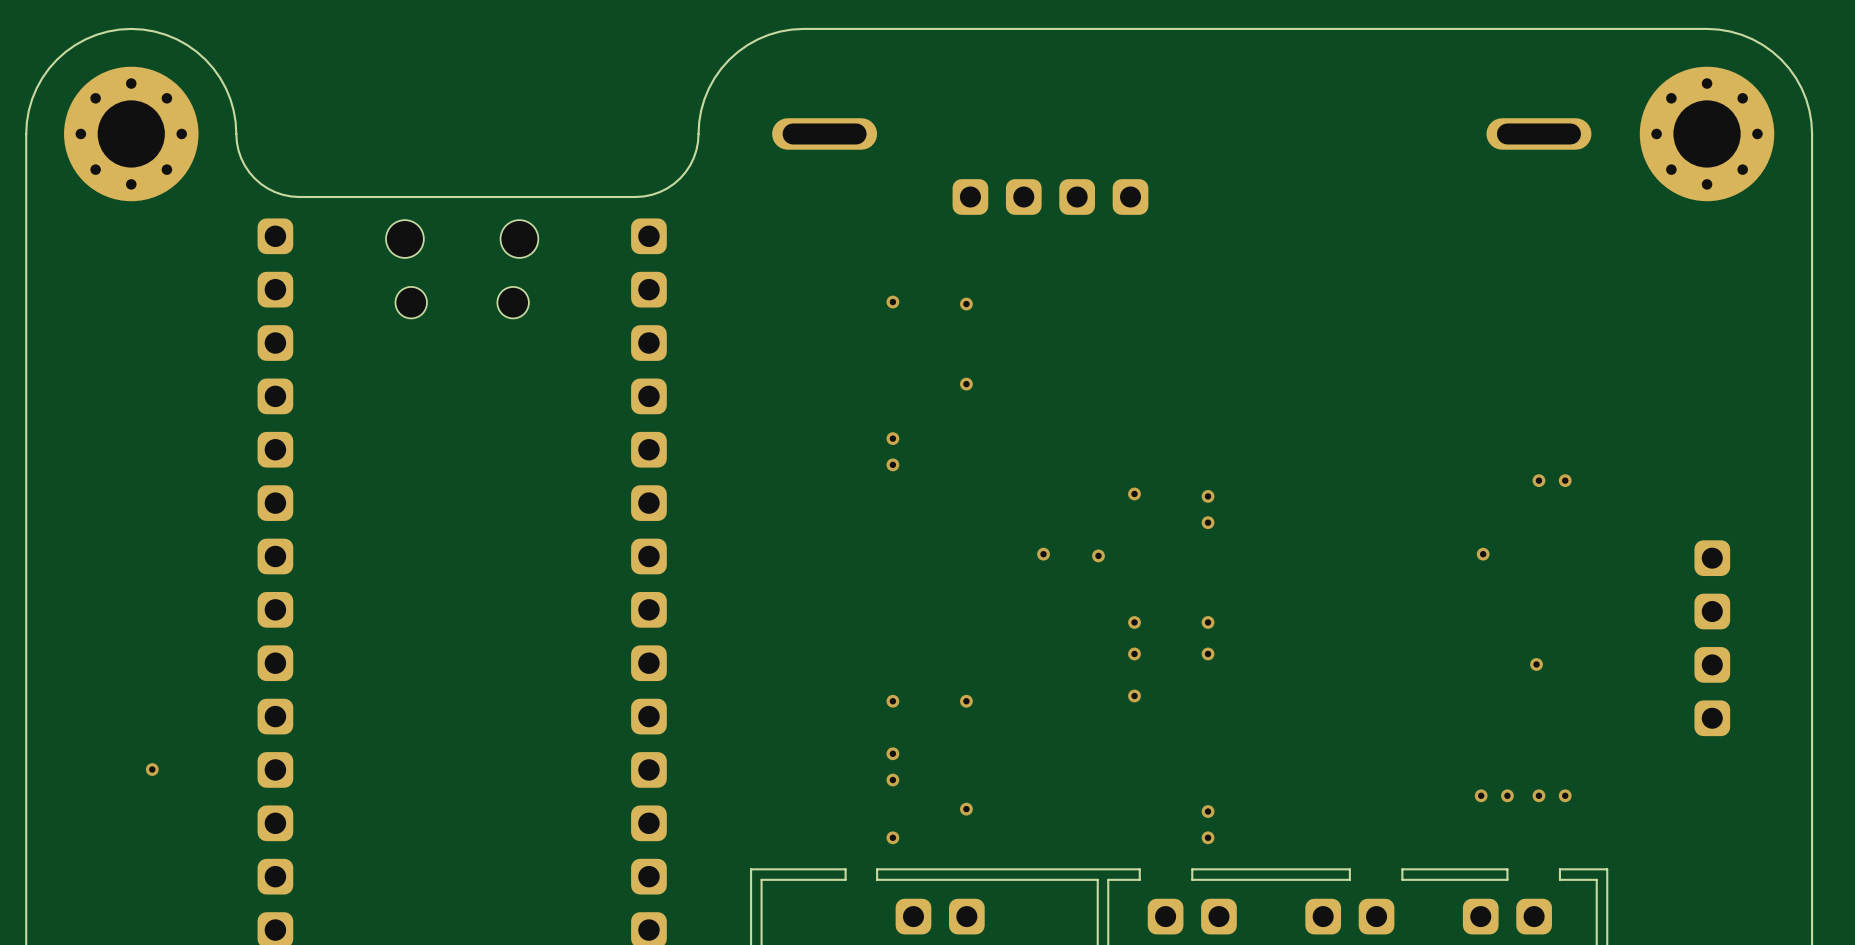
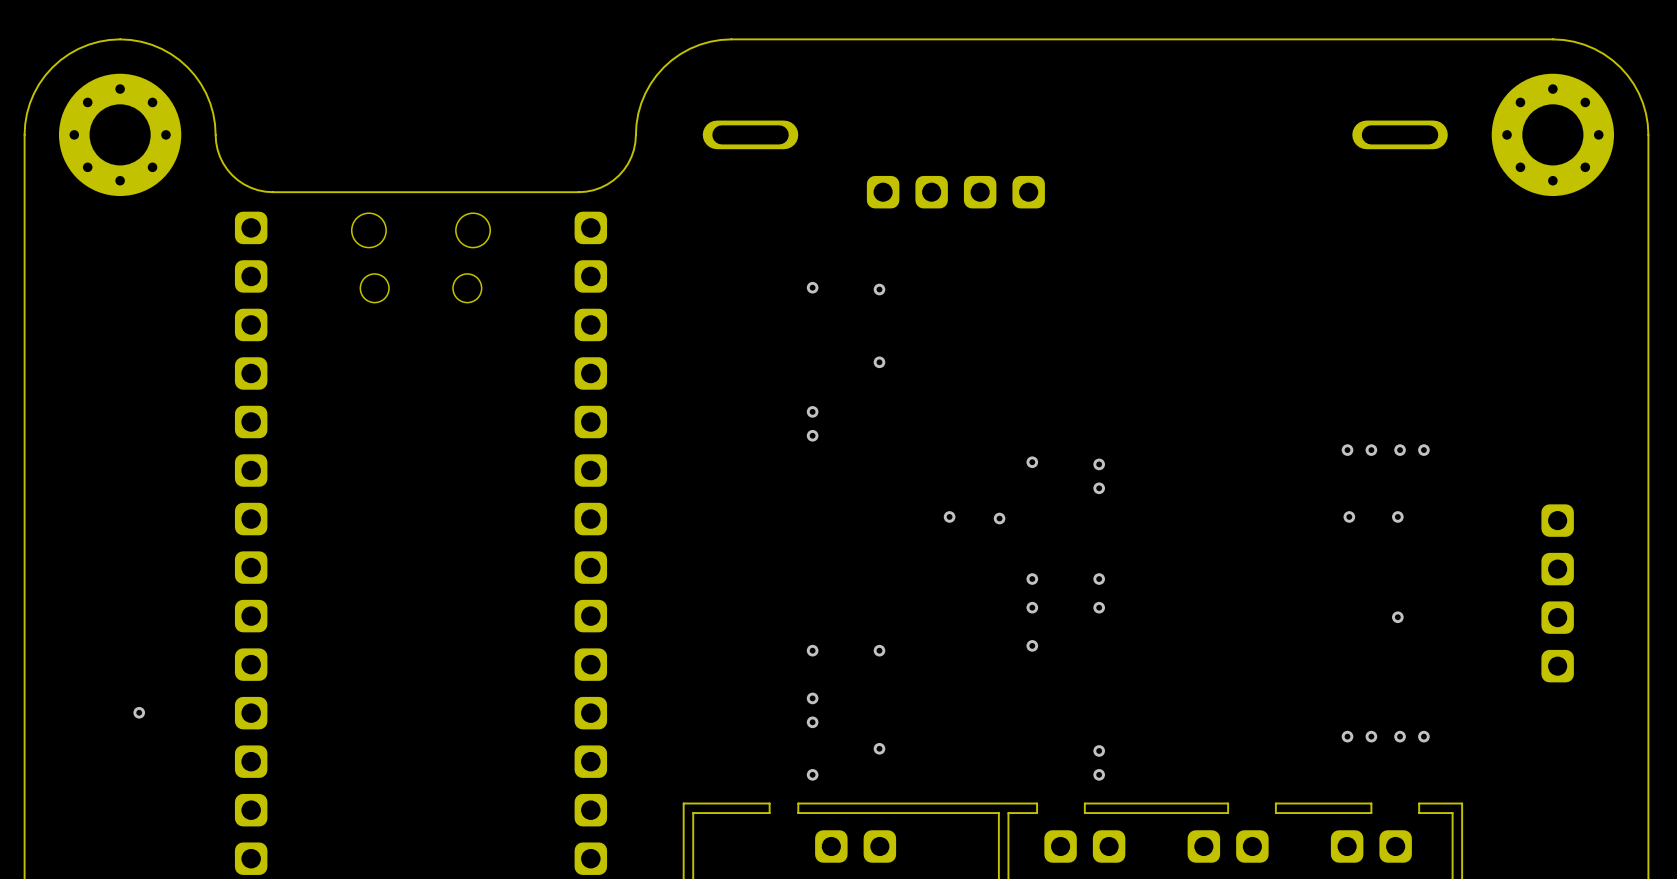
via: none -> (1347, 450)
via: none -> (1371, 450)
via: none -> (1397, 516)

